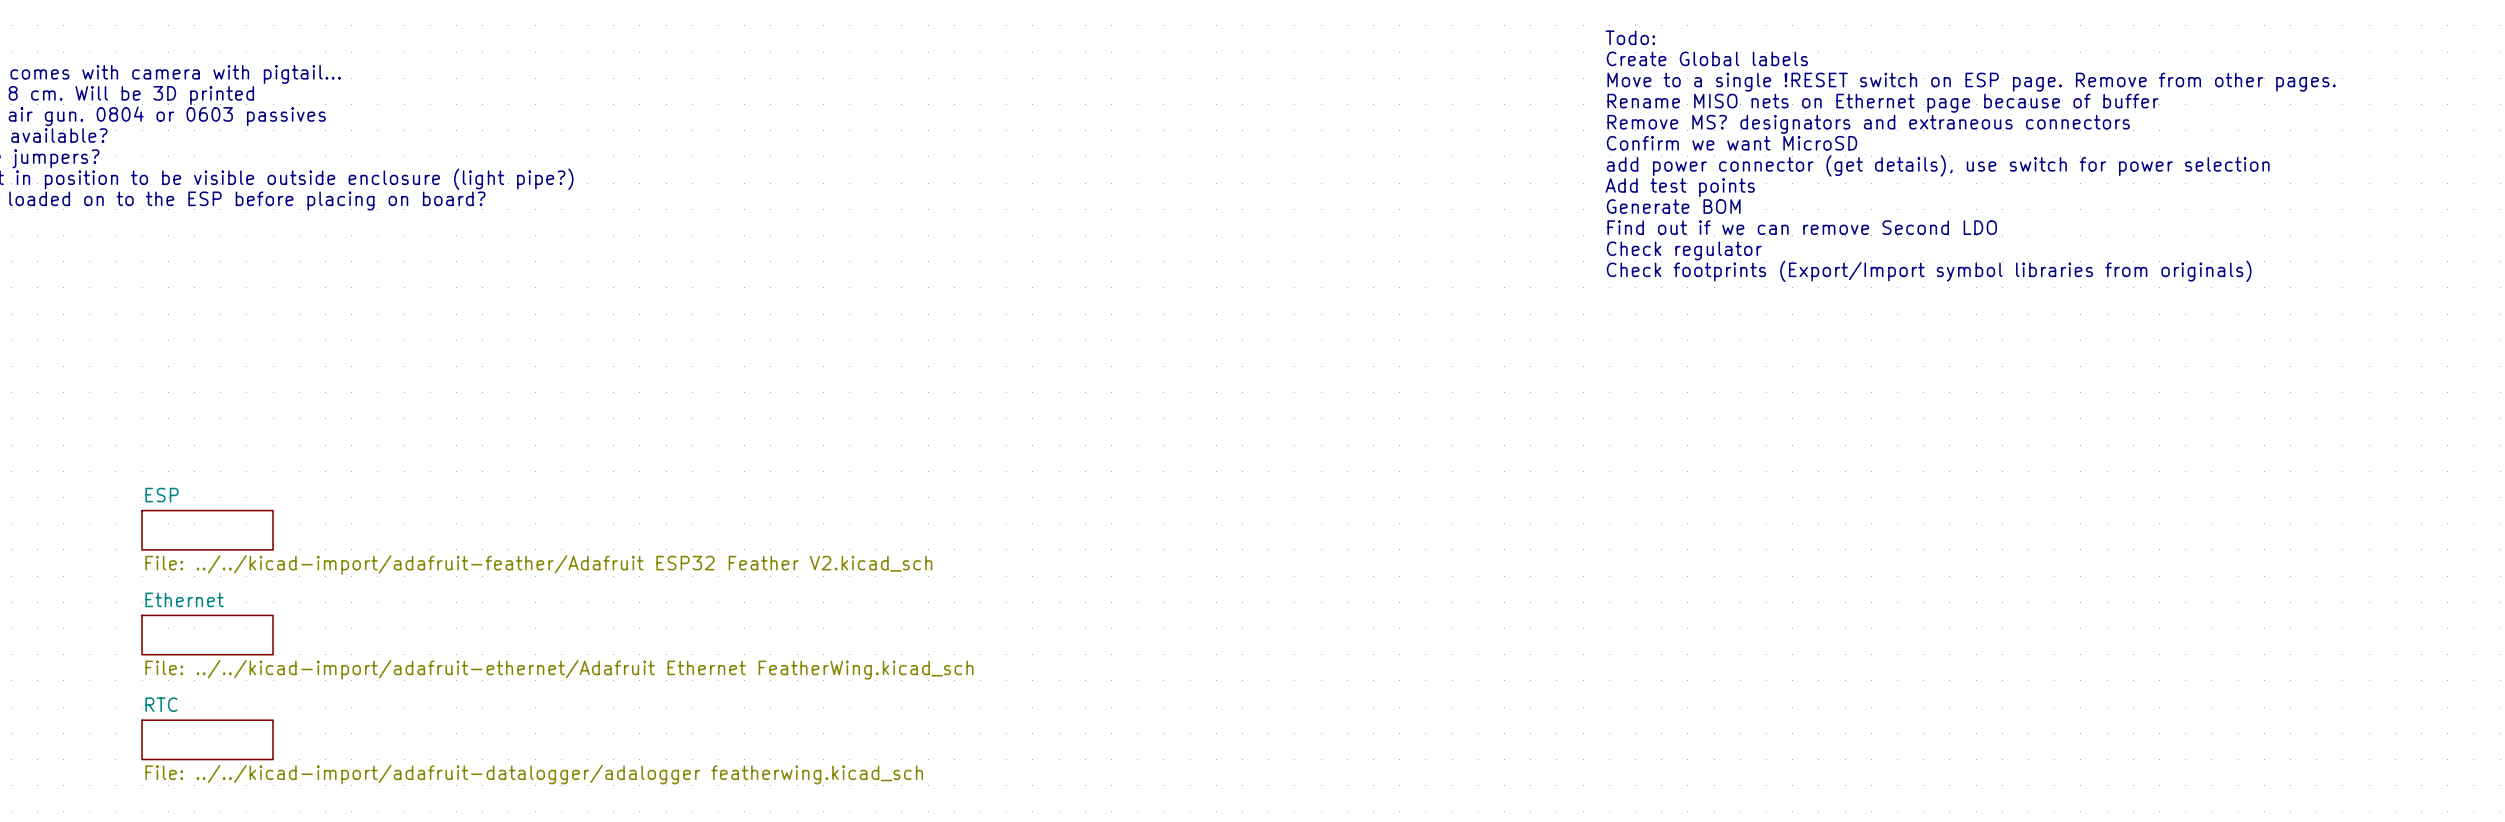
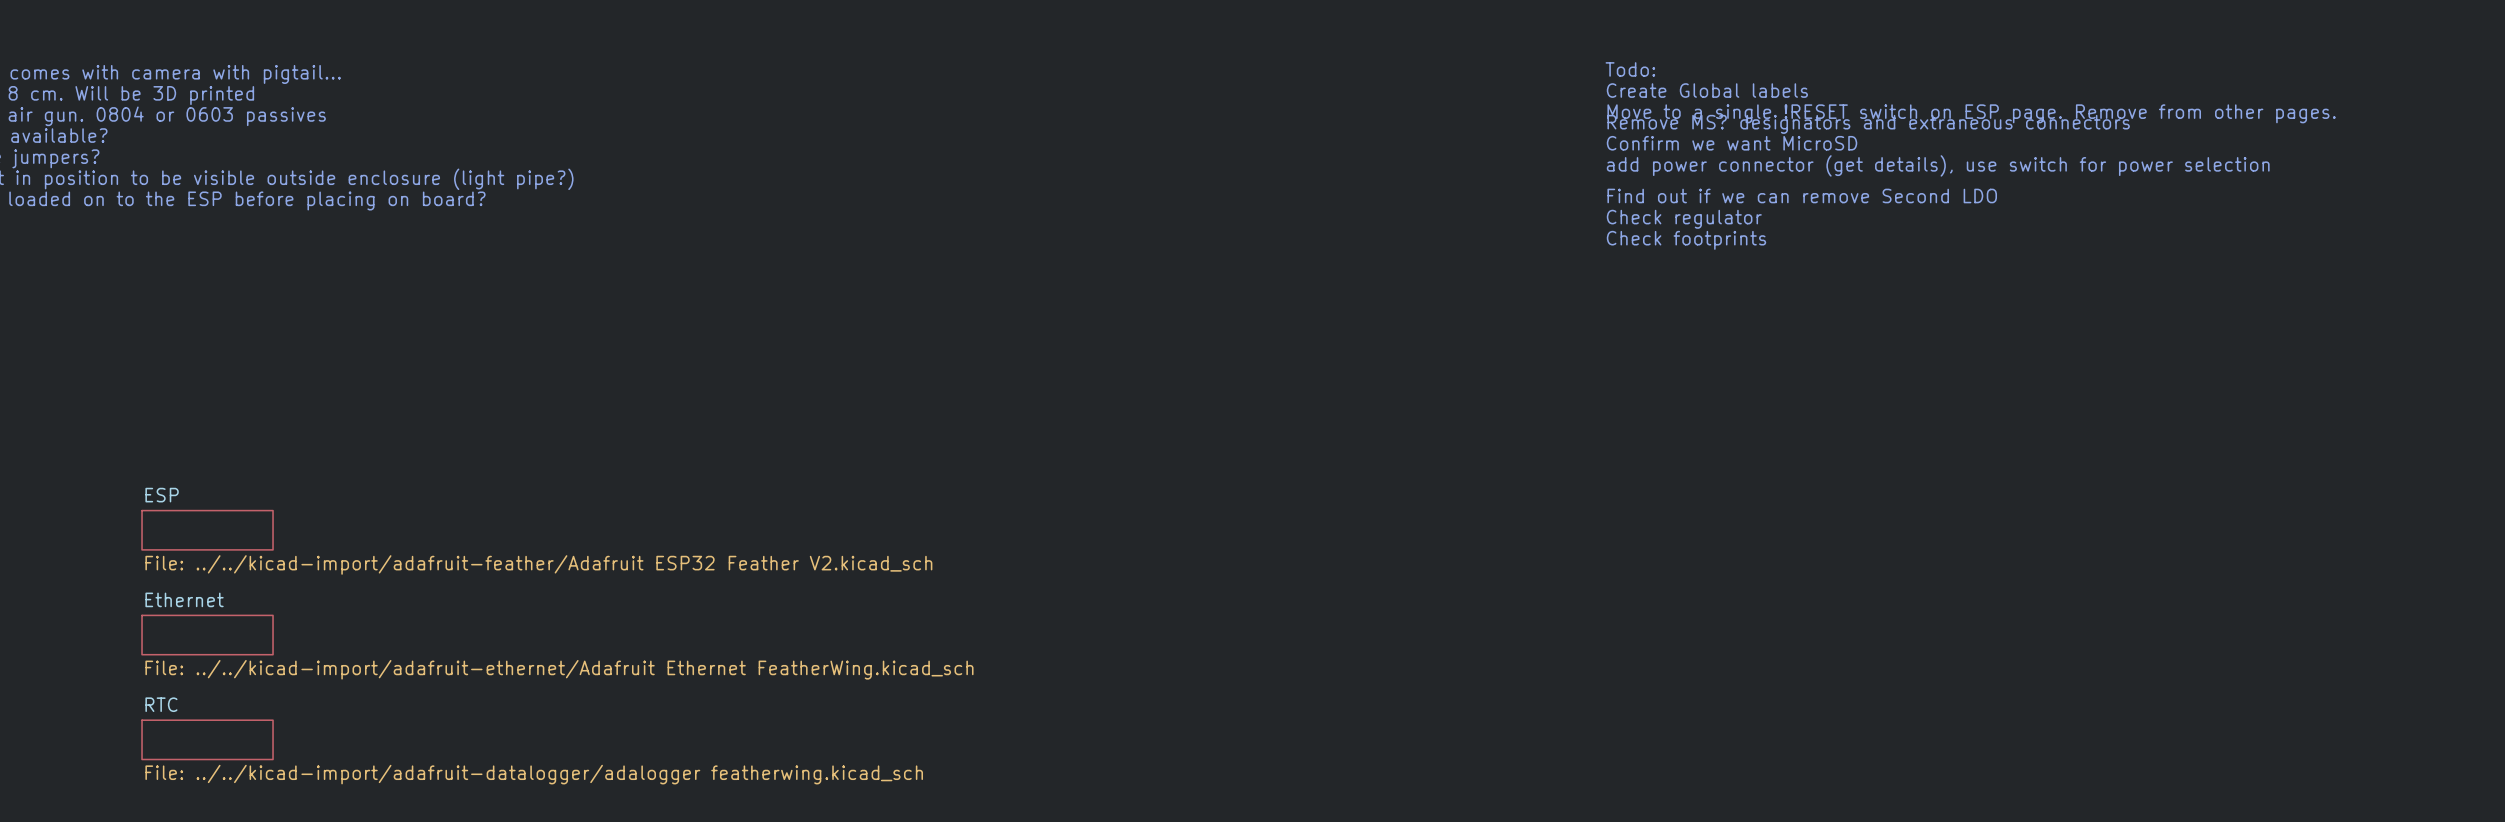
text position: Todo: (1630, 37) -> Todo: (1630, 69)
text position: Create Global labels (1707, 58) -> Create Global labels (1707, 90)
text position: Move to a single !RESET switch on ESP page. Remove from other pages. (1971, 82) -> Move to a single !RESET switch on ESP page. Remove from other pages. (1971, 113)
text: Rename MISO nets on Ethernet page because of buffer (1882, 103) -> none
text: Add test points (1680, 187) -> none
text: Generate BOM (1673, 206) -> none
text position: Find out if we can remove Second LDO (1802, 227) -> Find out if we can remove Second LDO (1802, 195)
text: none -> Check footprints (1686, 240)
text position: Check regulator (1684, 250) -> Check regulator (1684, 219)
text: Check footprints (Export/Import symbol libraries from originals) (1929, 271) -> none

